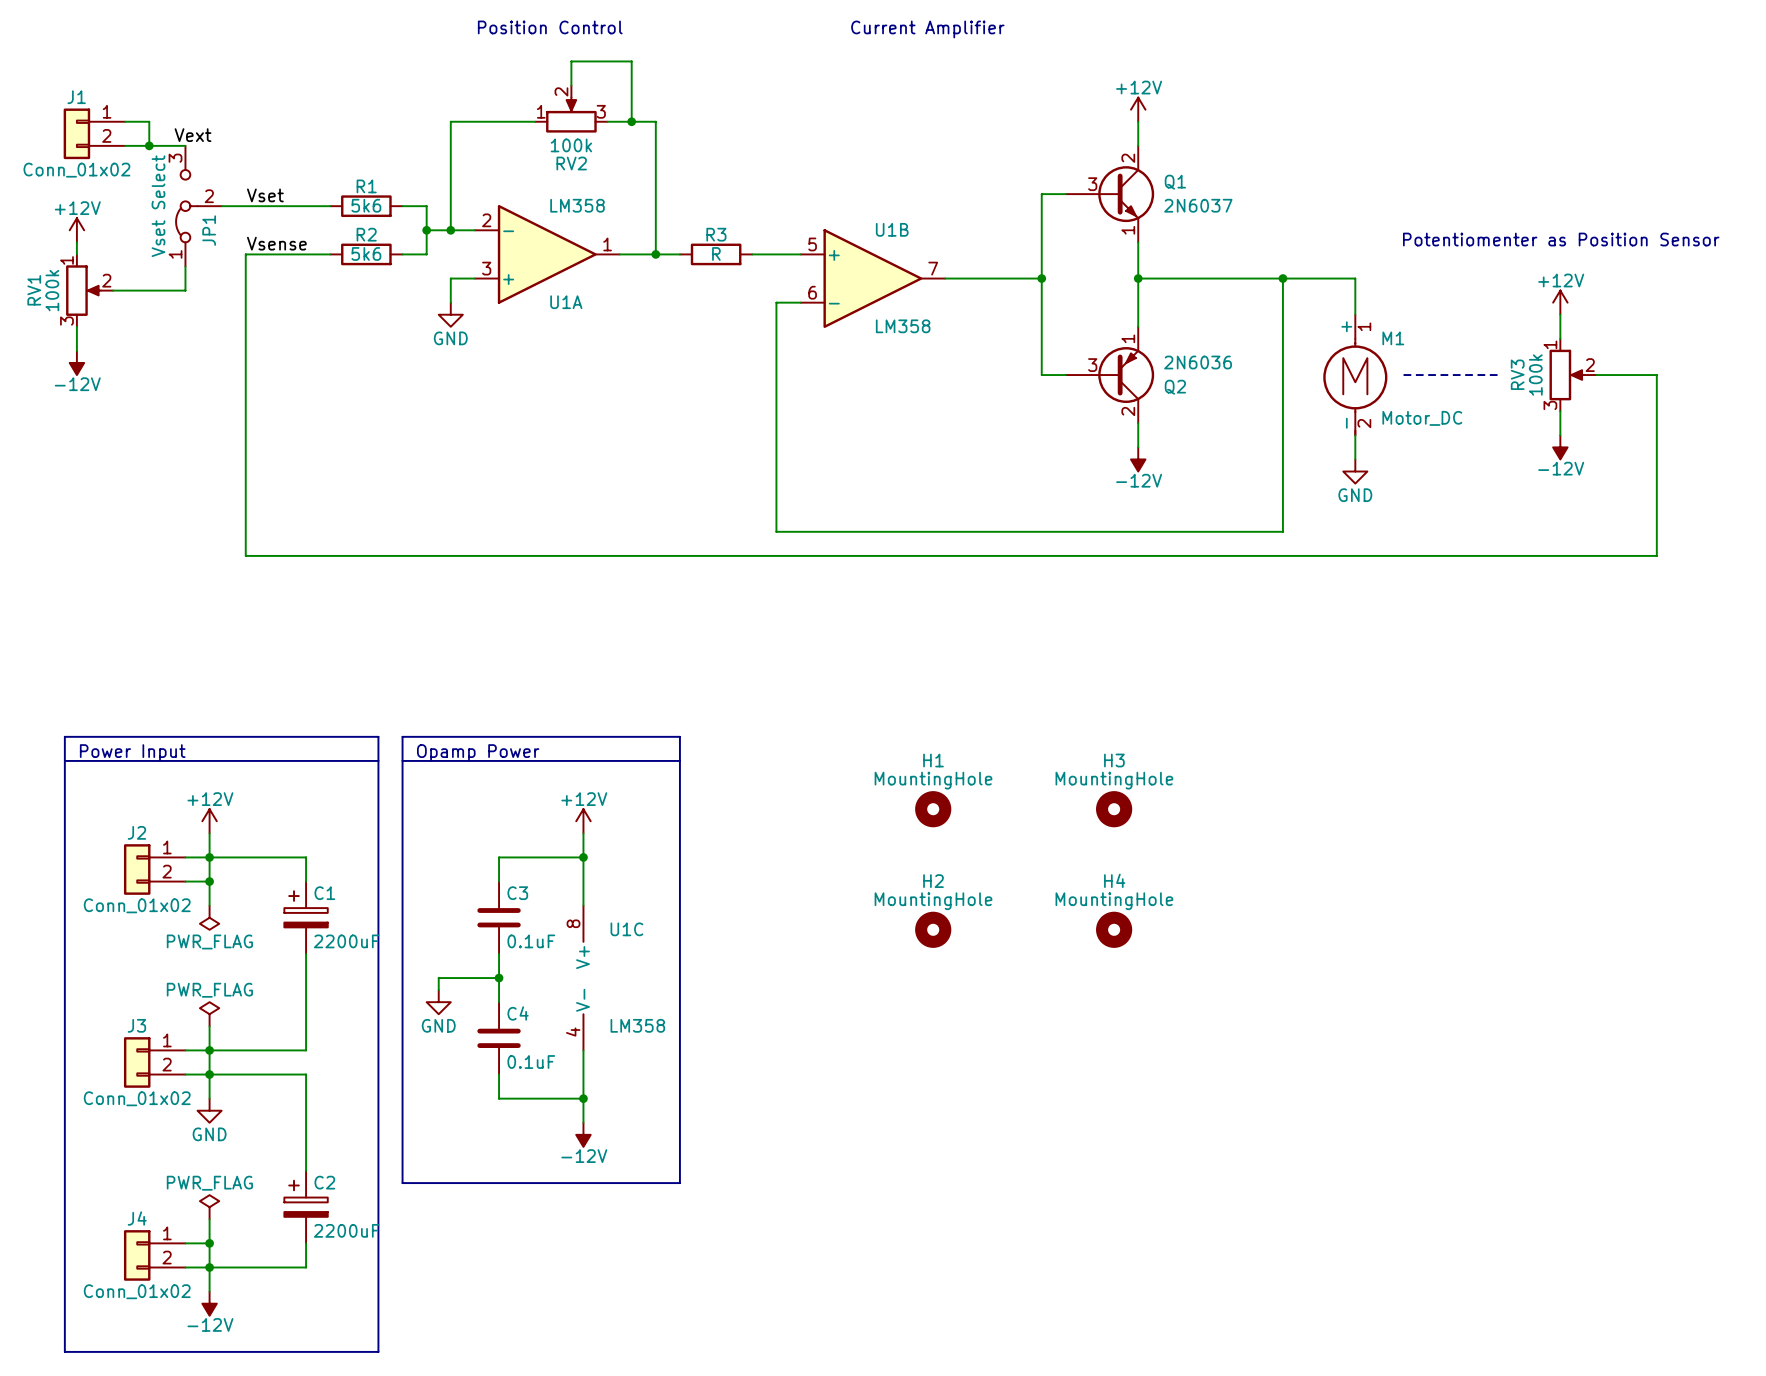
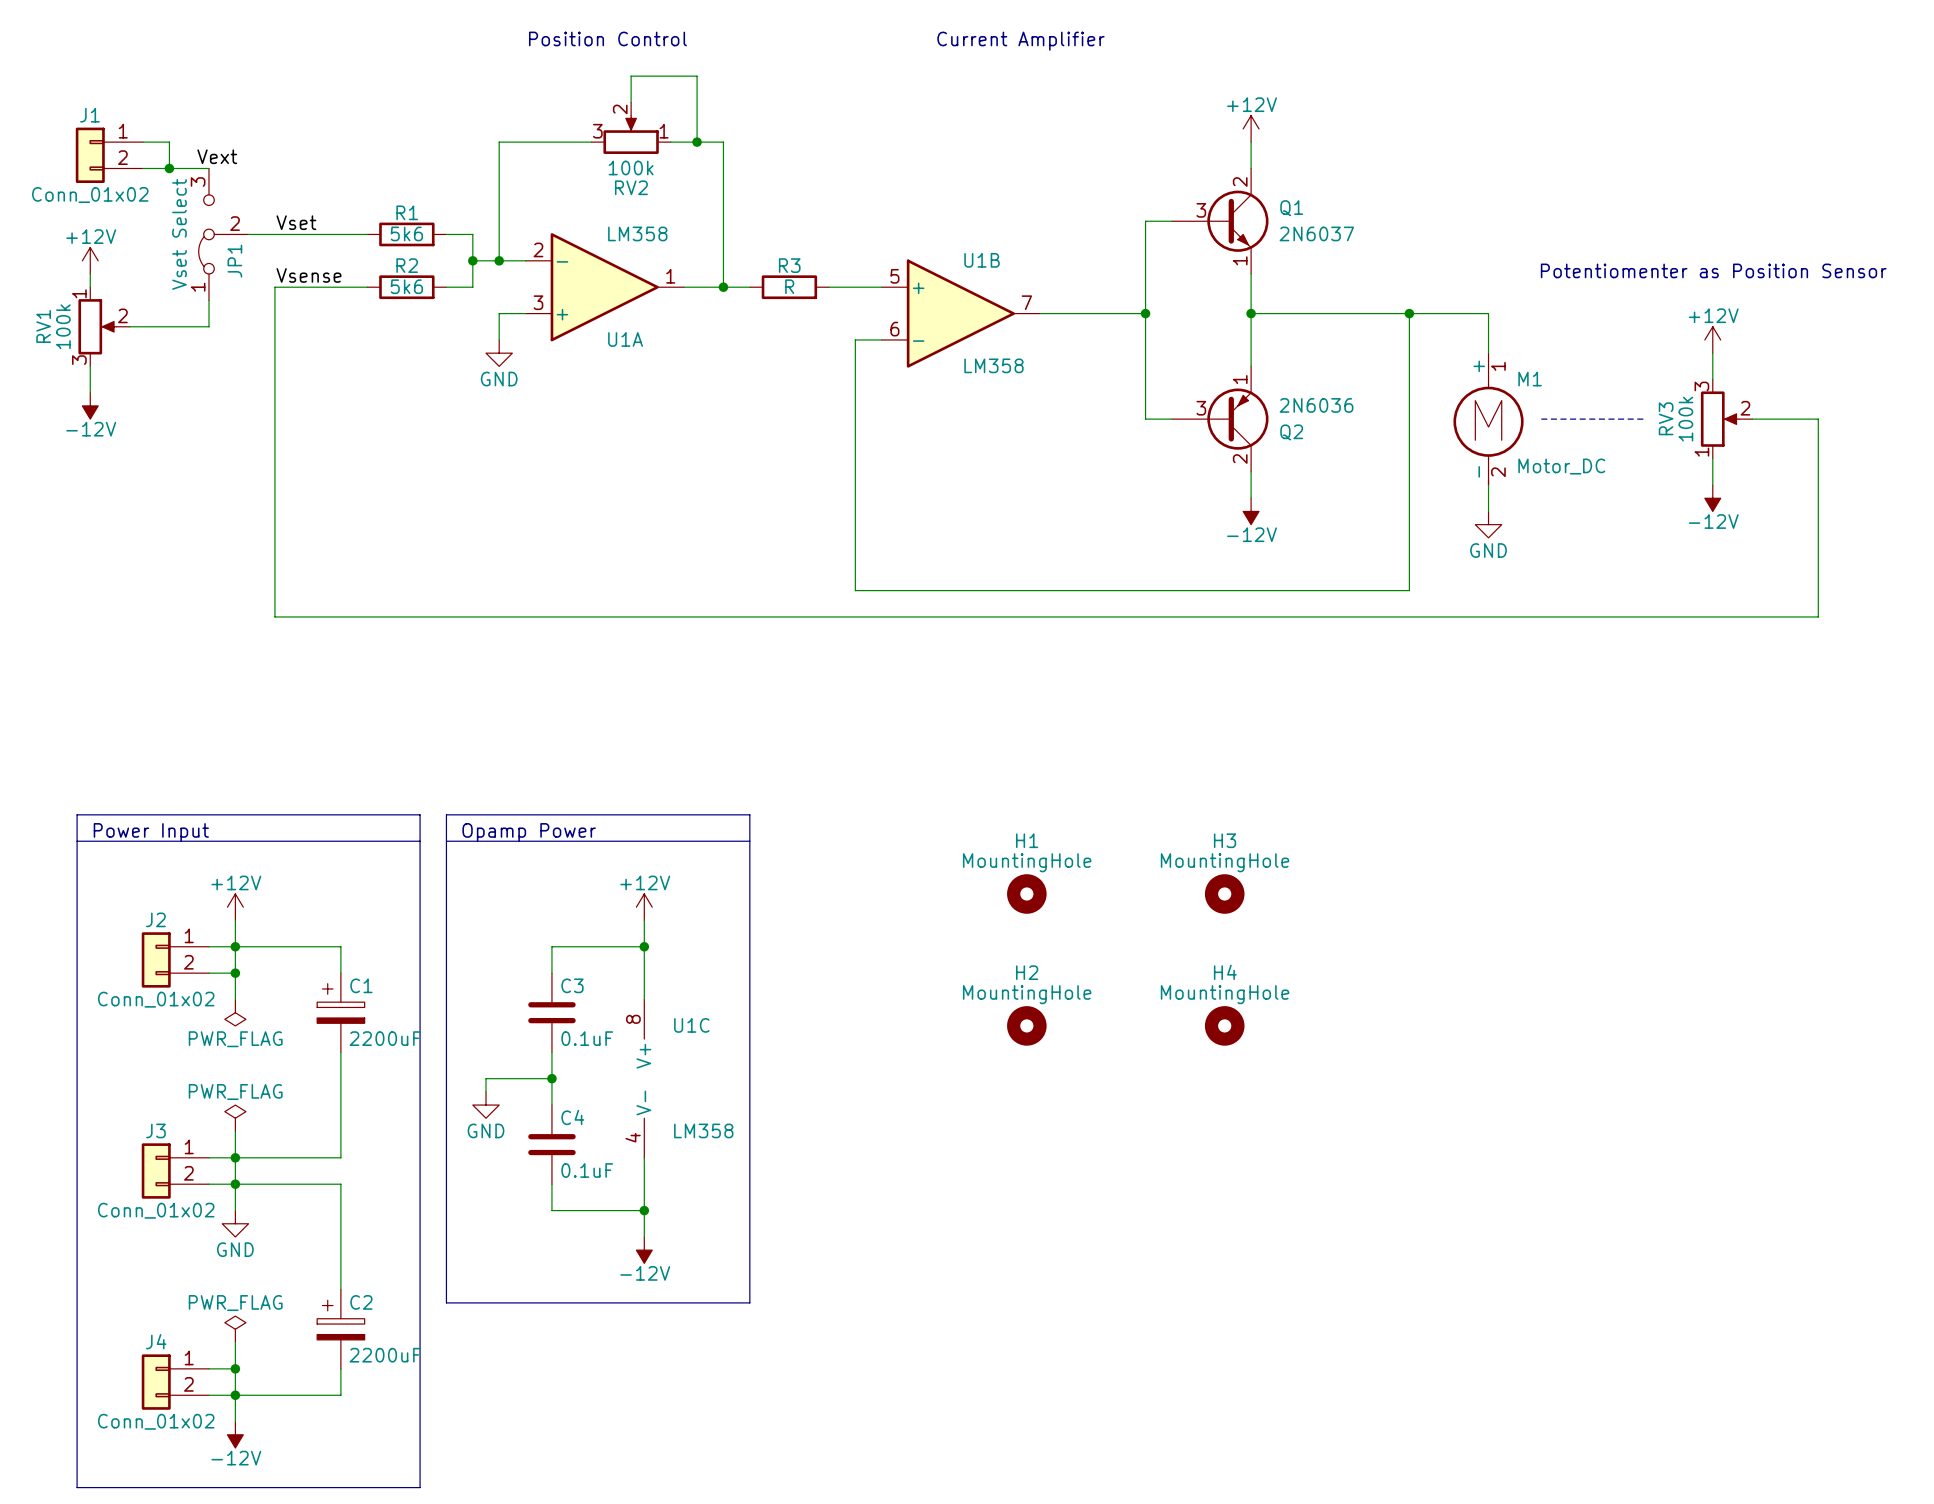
RV2 flip: as is (571, 115) -> left-right (631, 134)
RV3 flip: as is (1566, 375) -> up-down (1720, 419)

